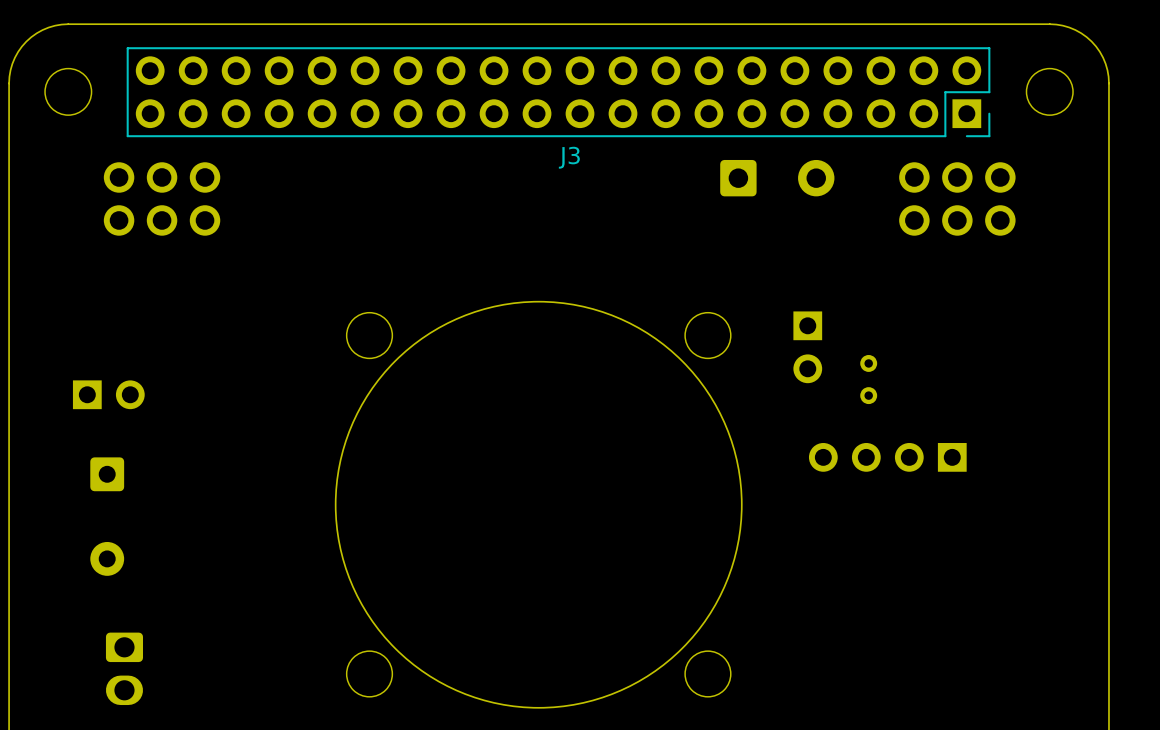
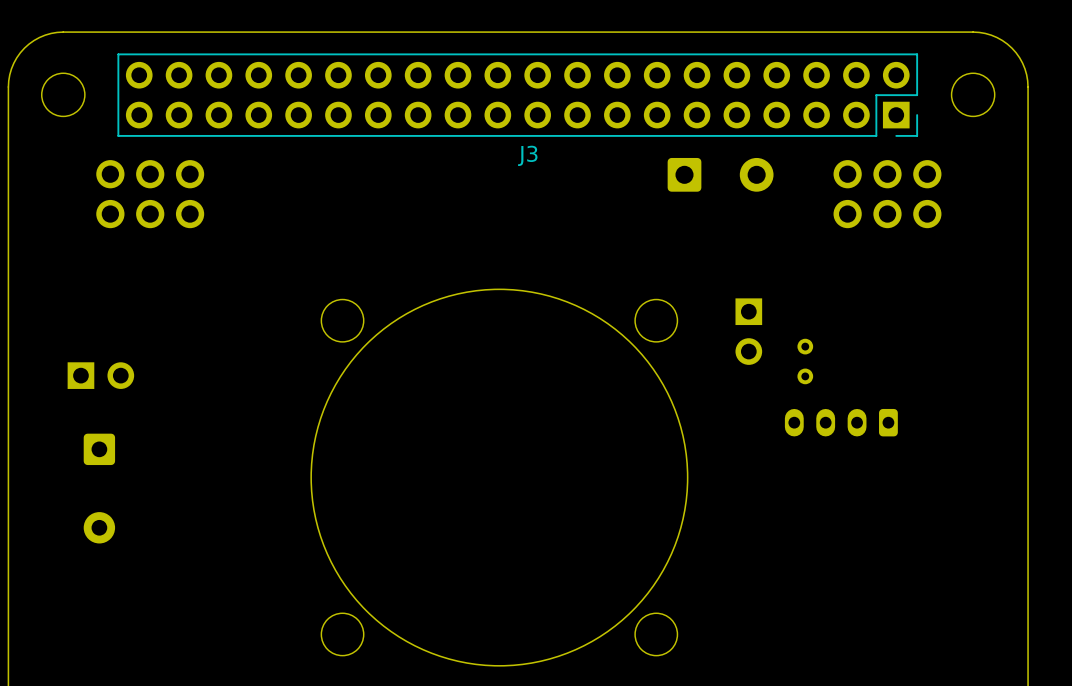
part: none -> (841, 422)
part: (887, 457) -> none
part: (124, 668) -> none

